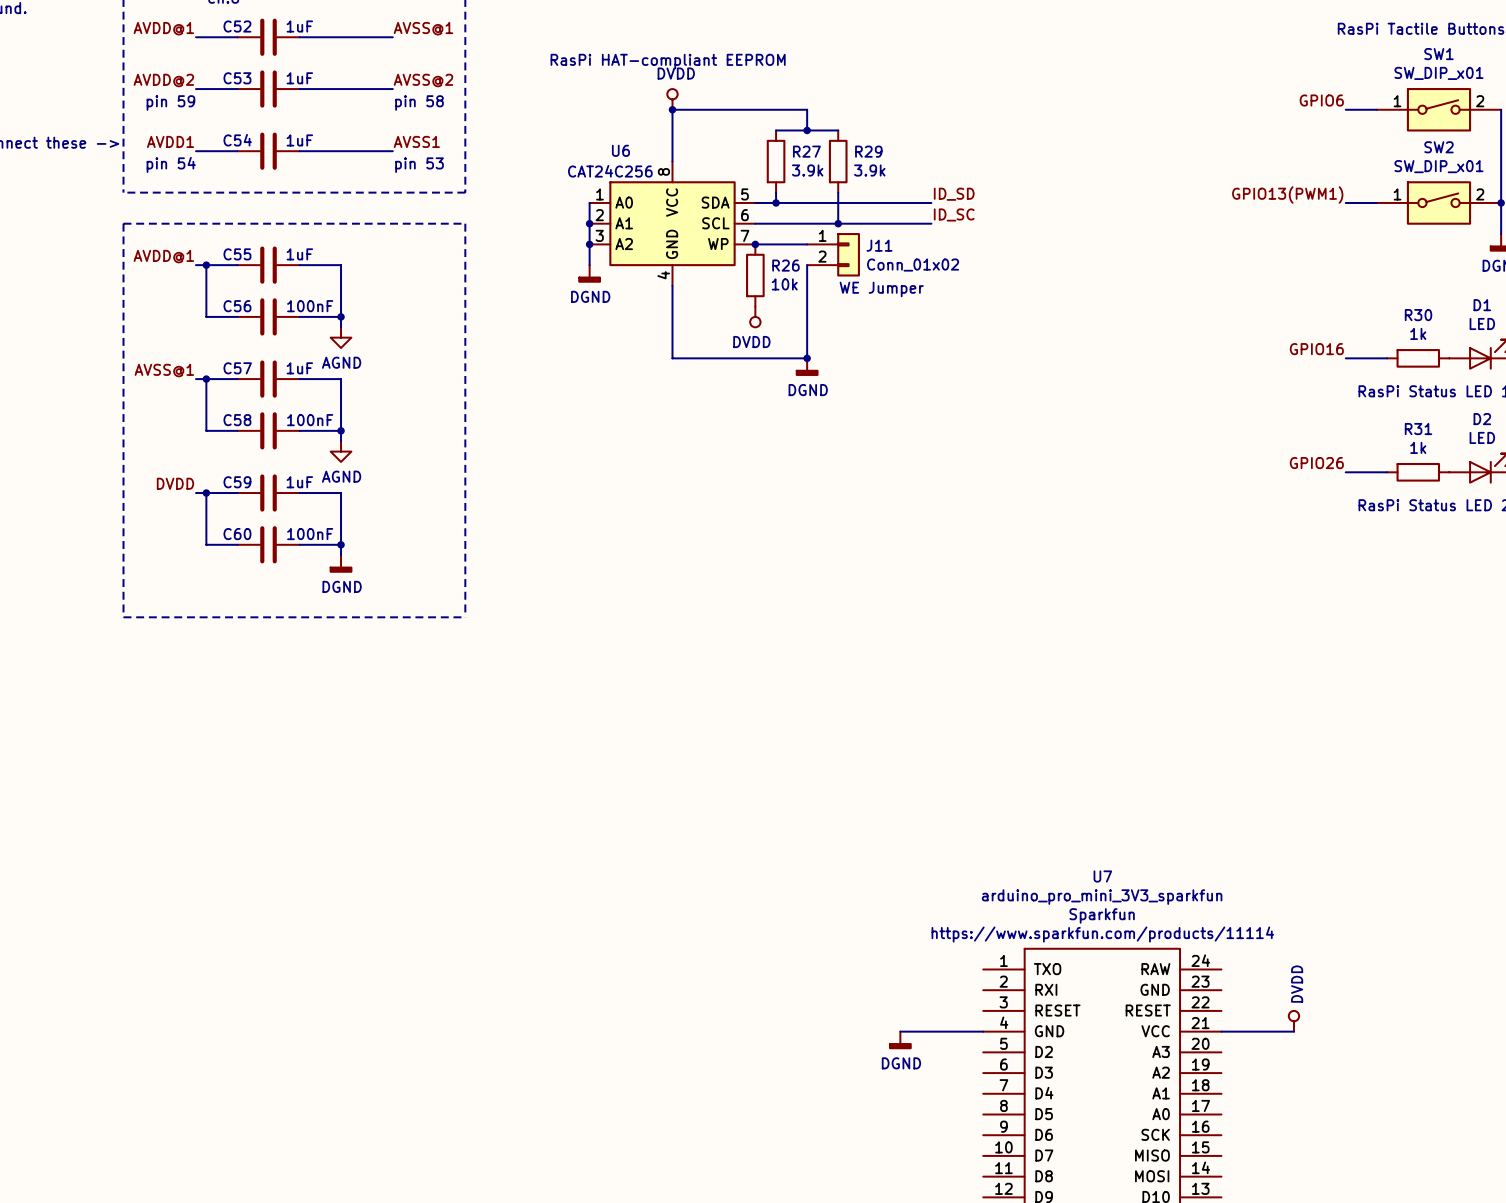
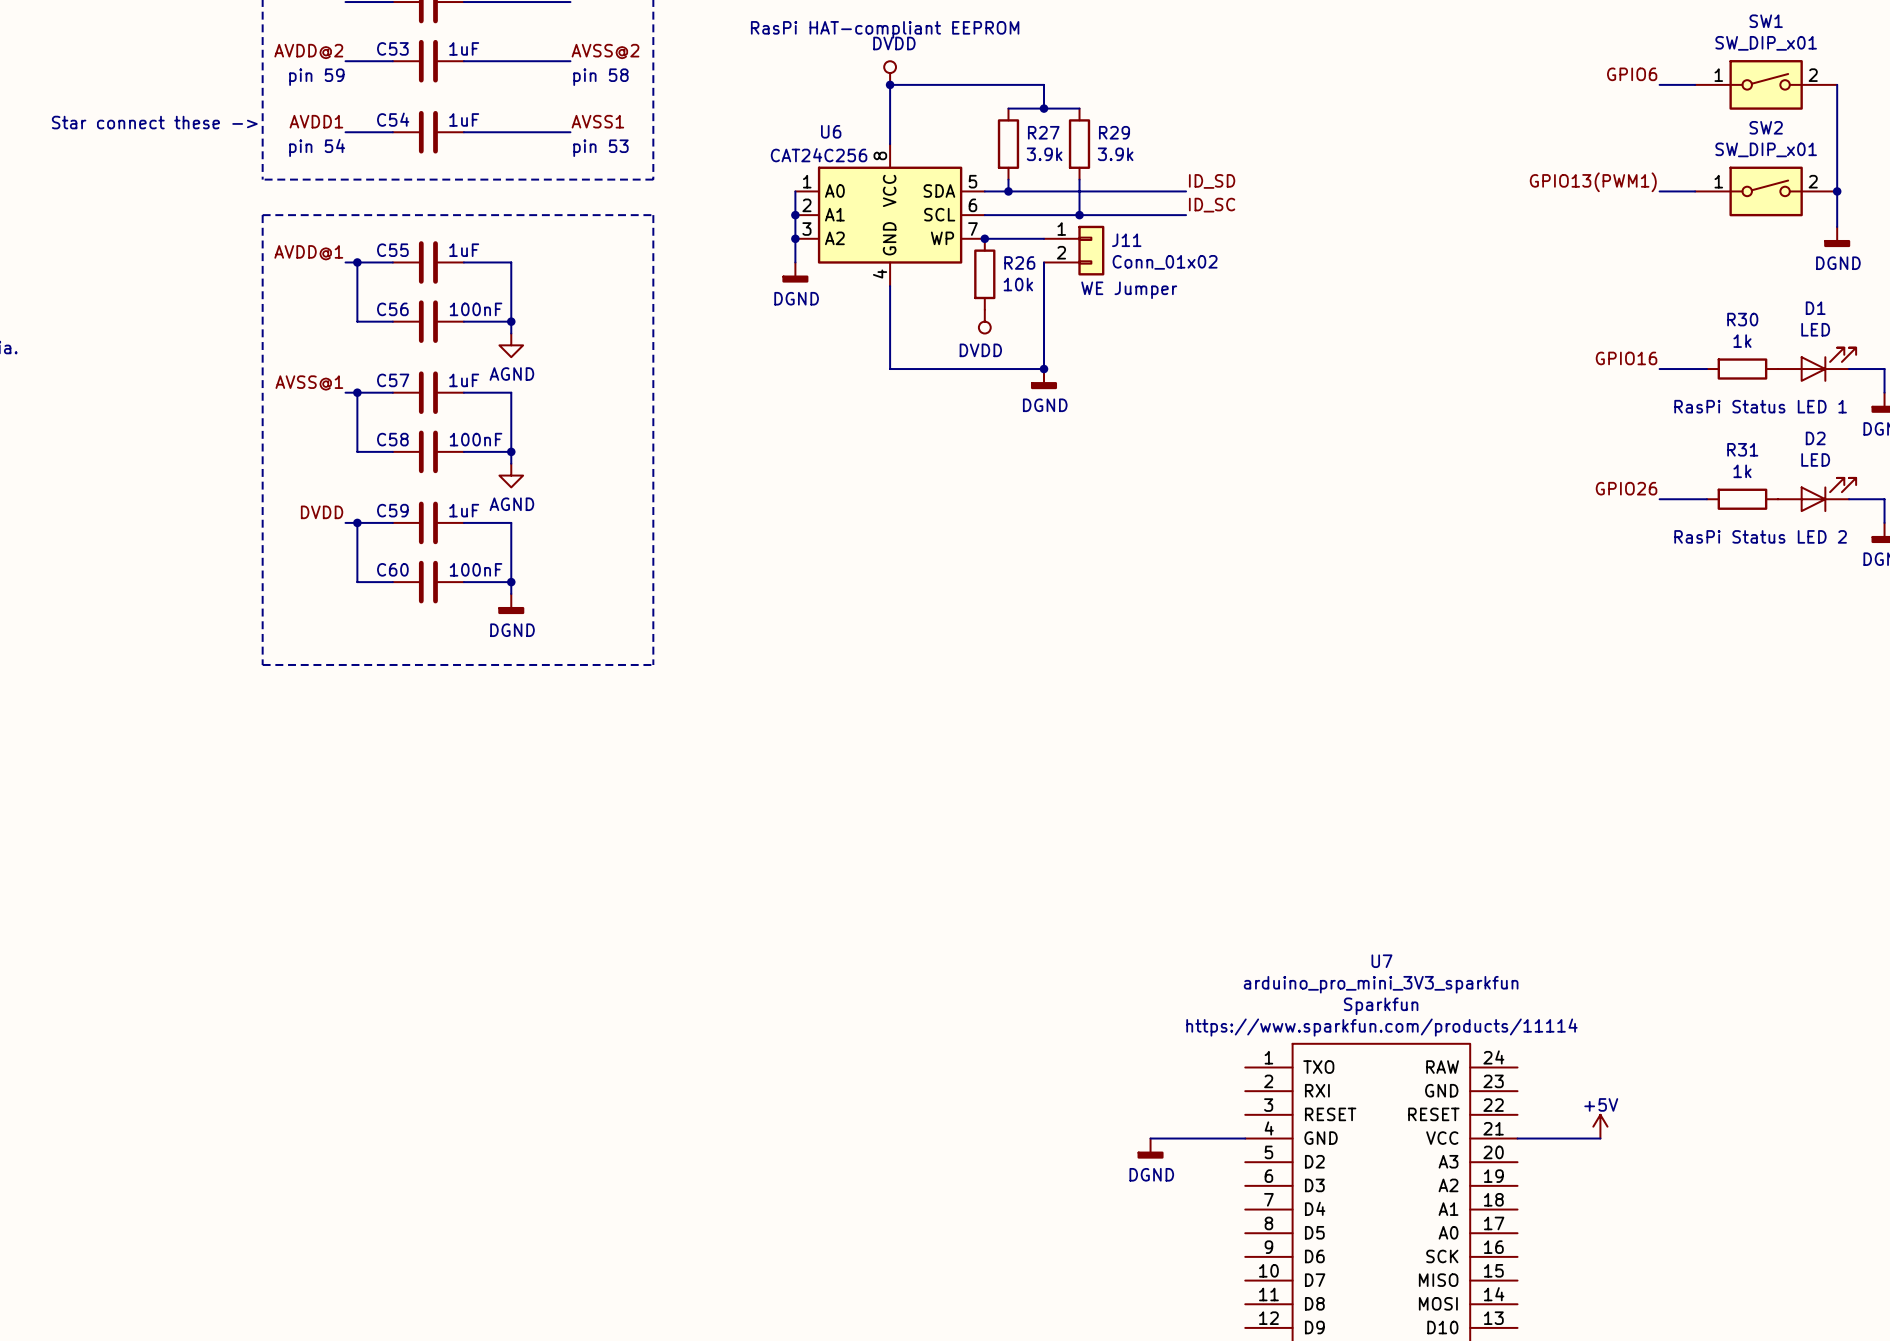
power symbol: DVDD (1293, 1021) -> +5V (1600, 1126)

